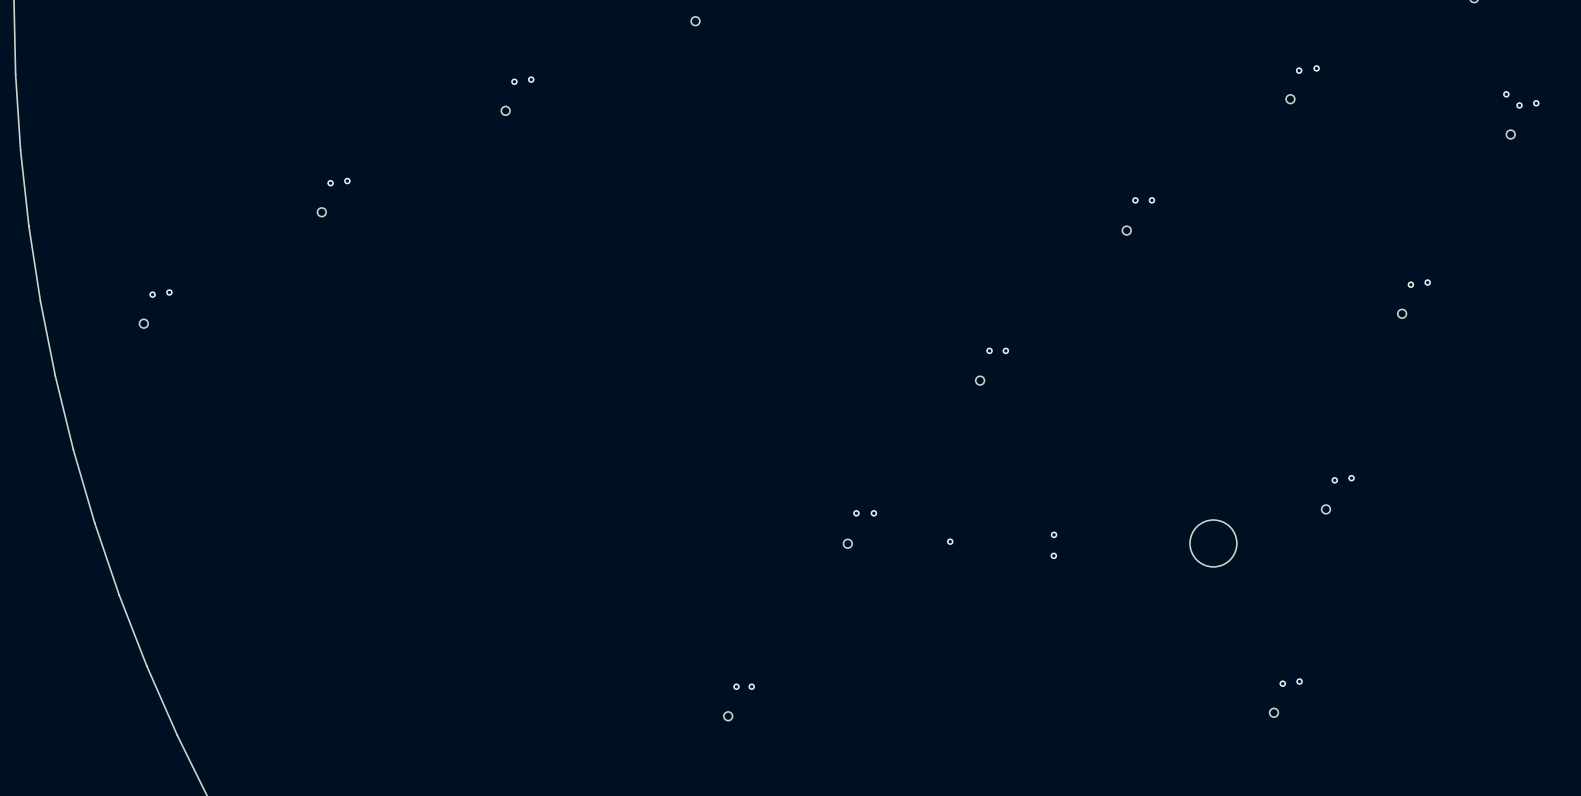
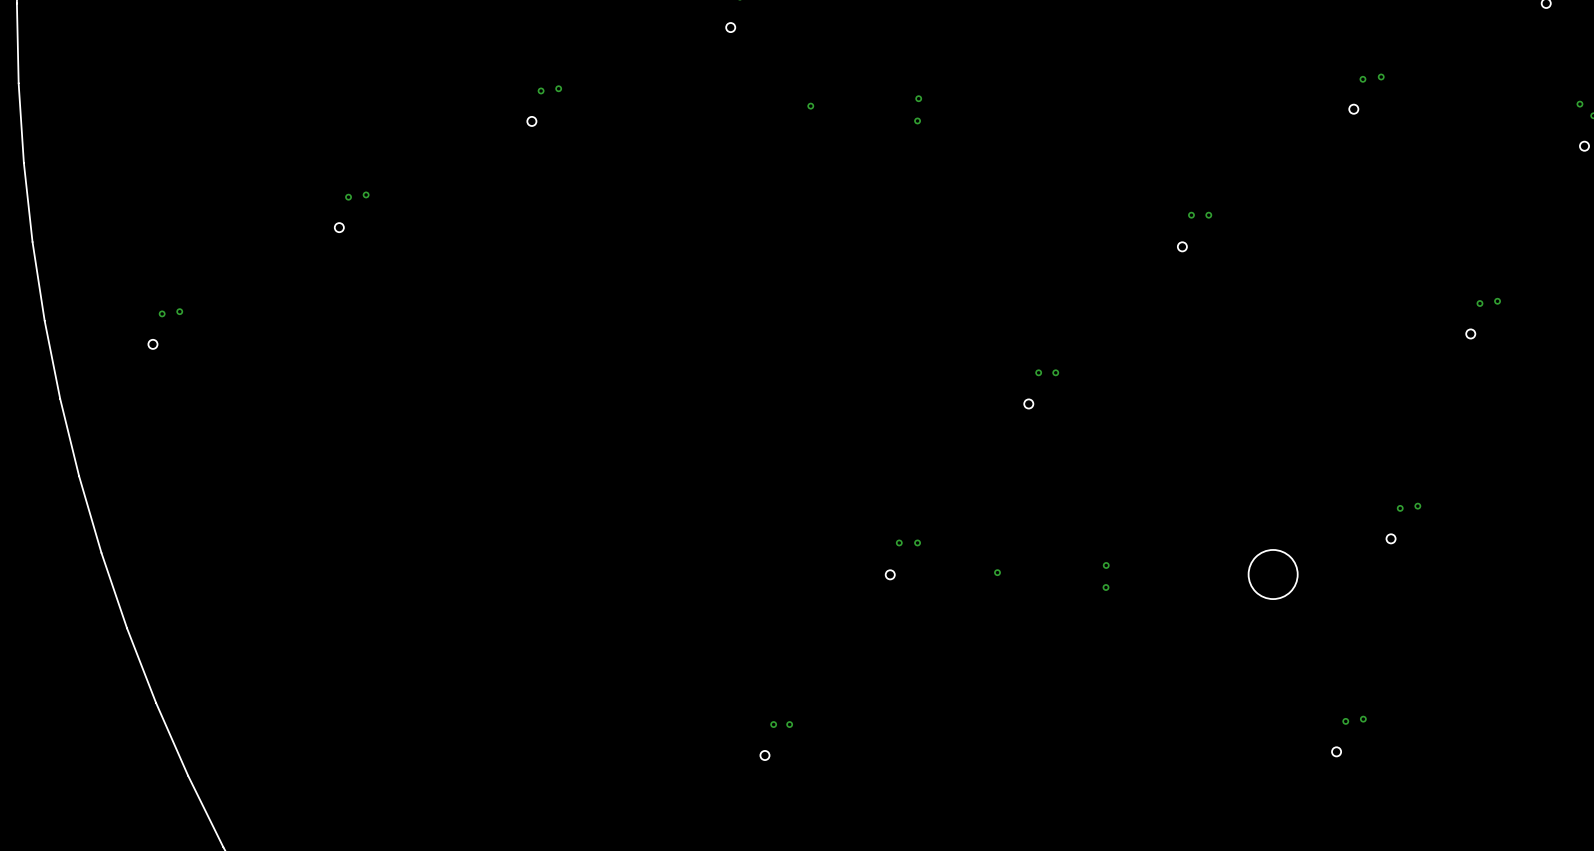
via: none -> (918, 98)
via: none -> (810, 106)
via: none -> (917, 120)

